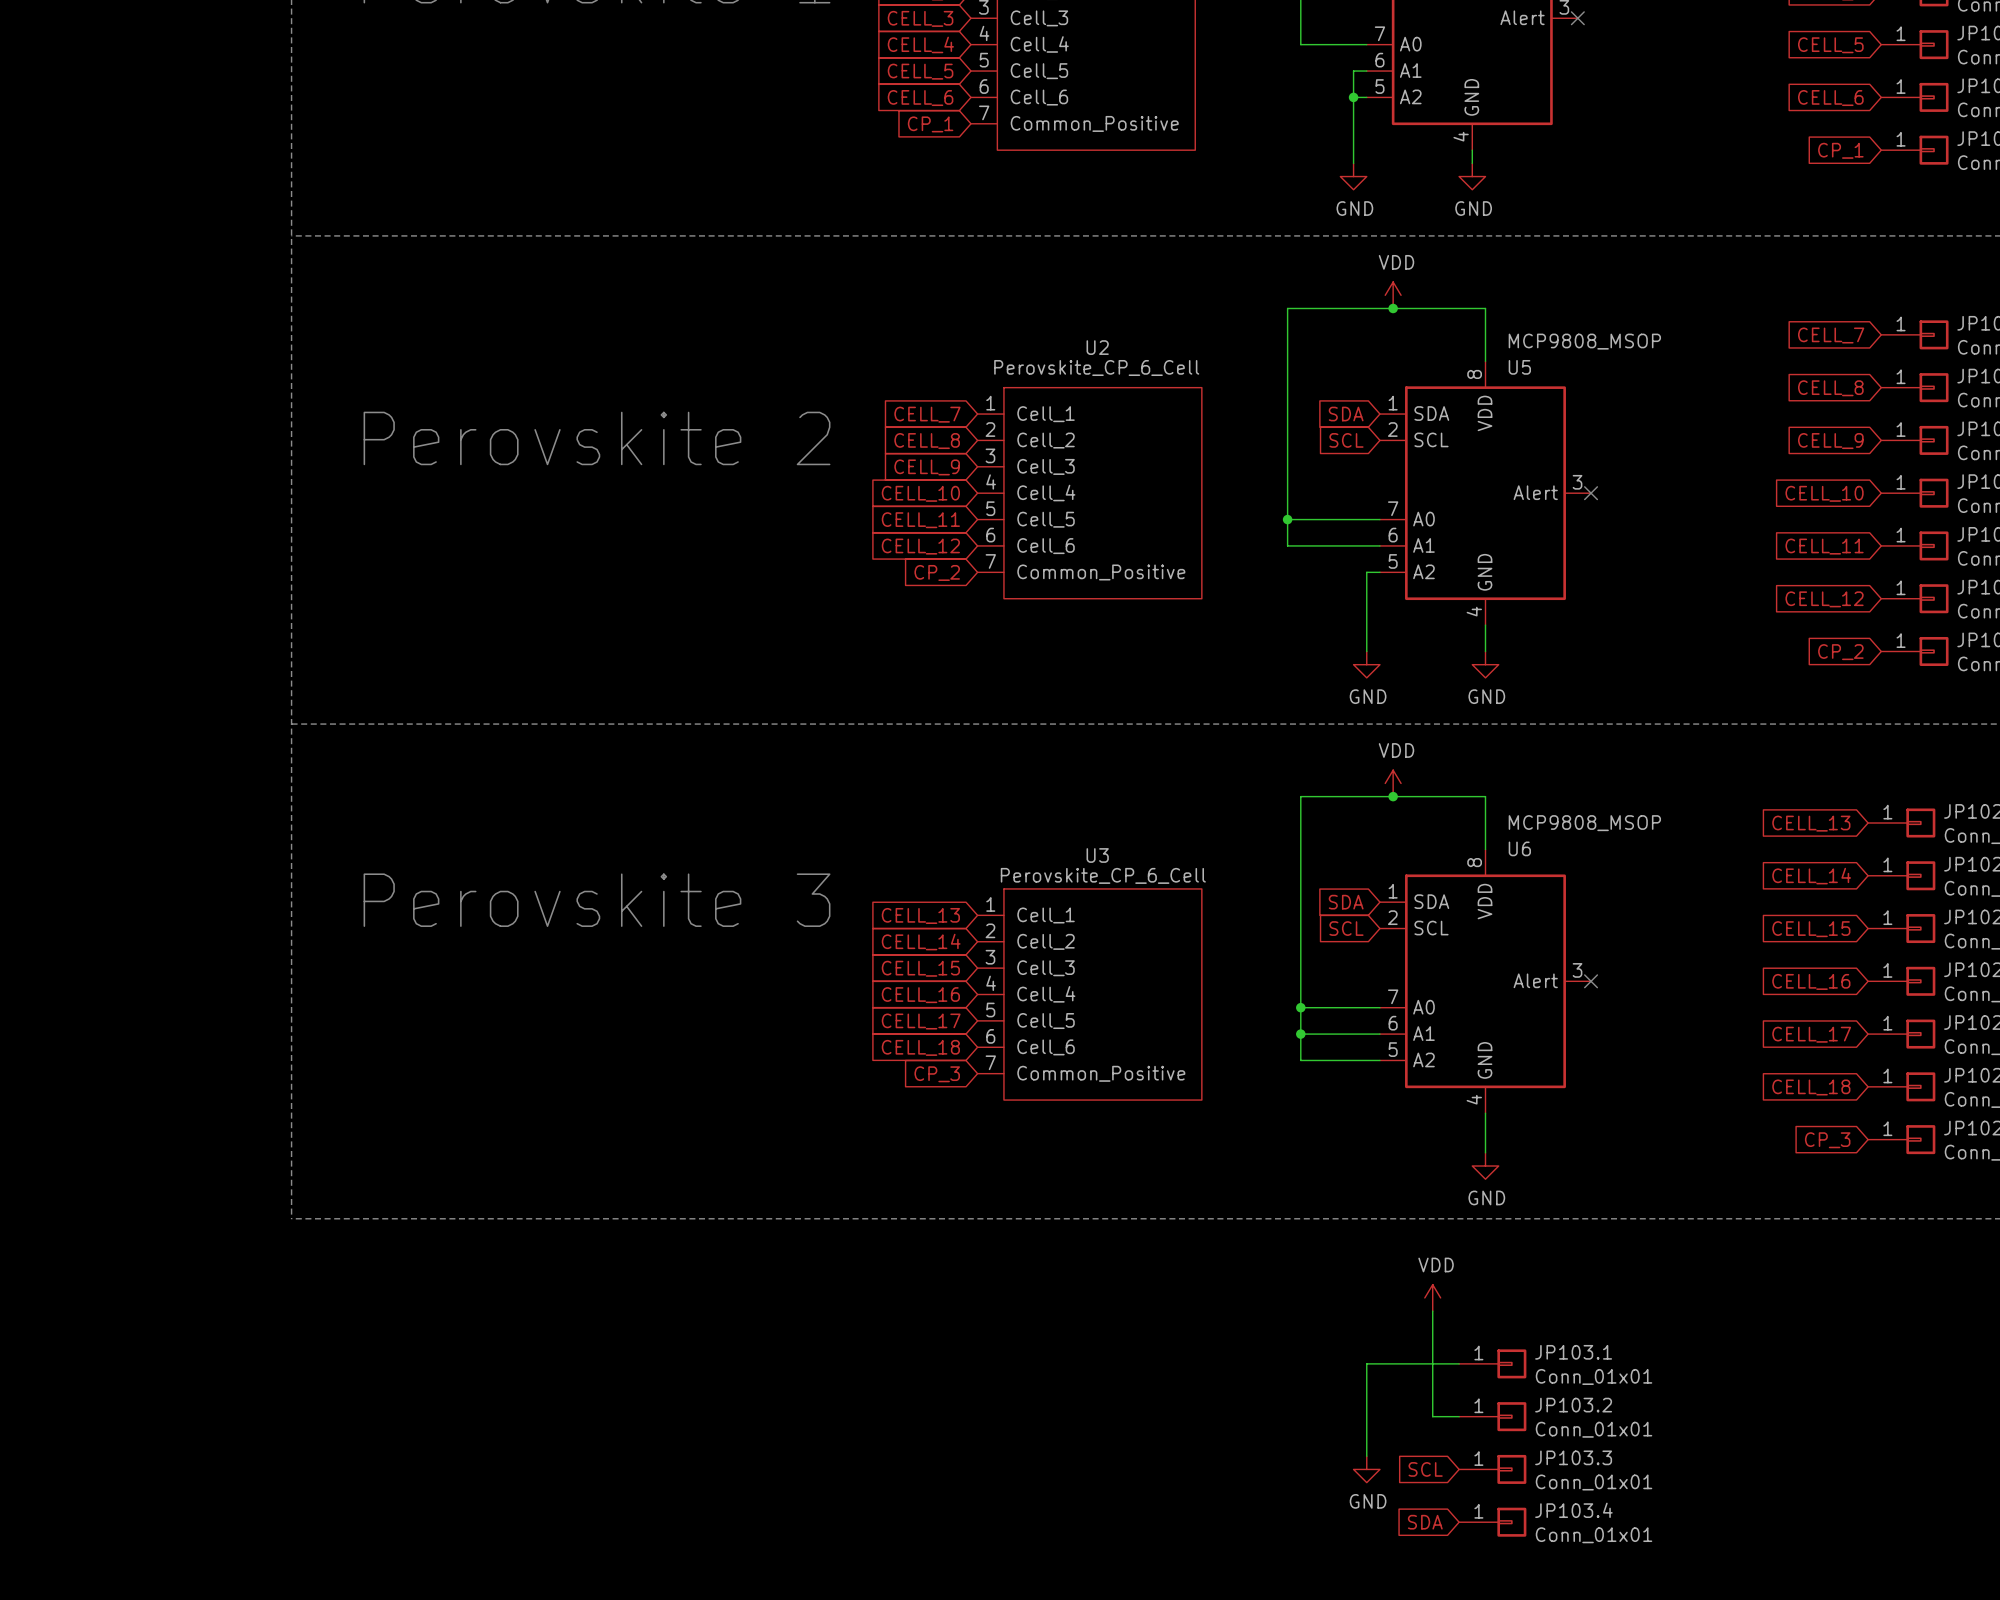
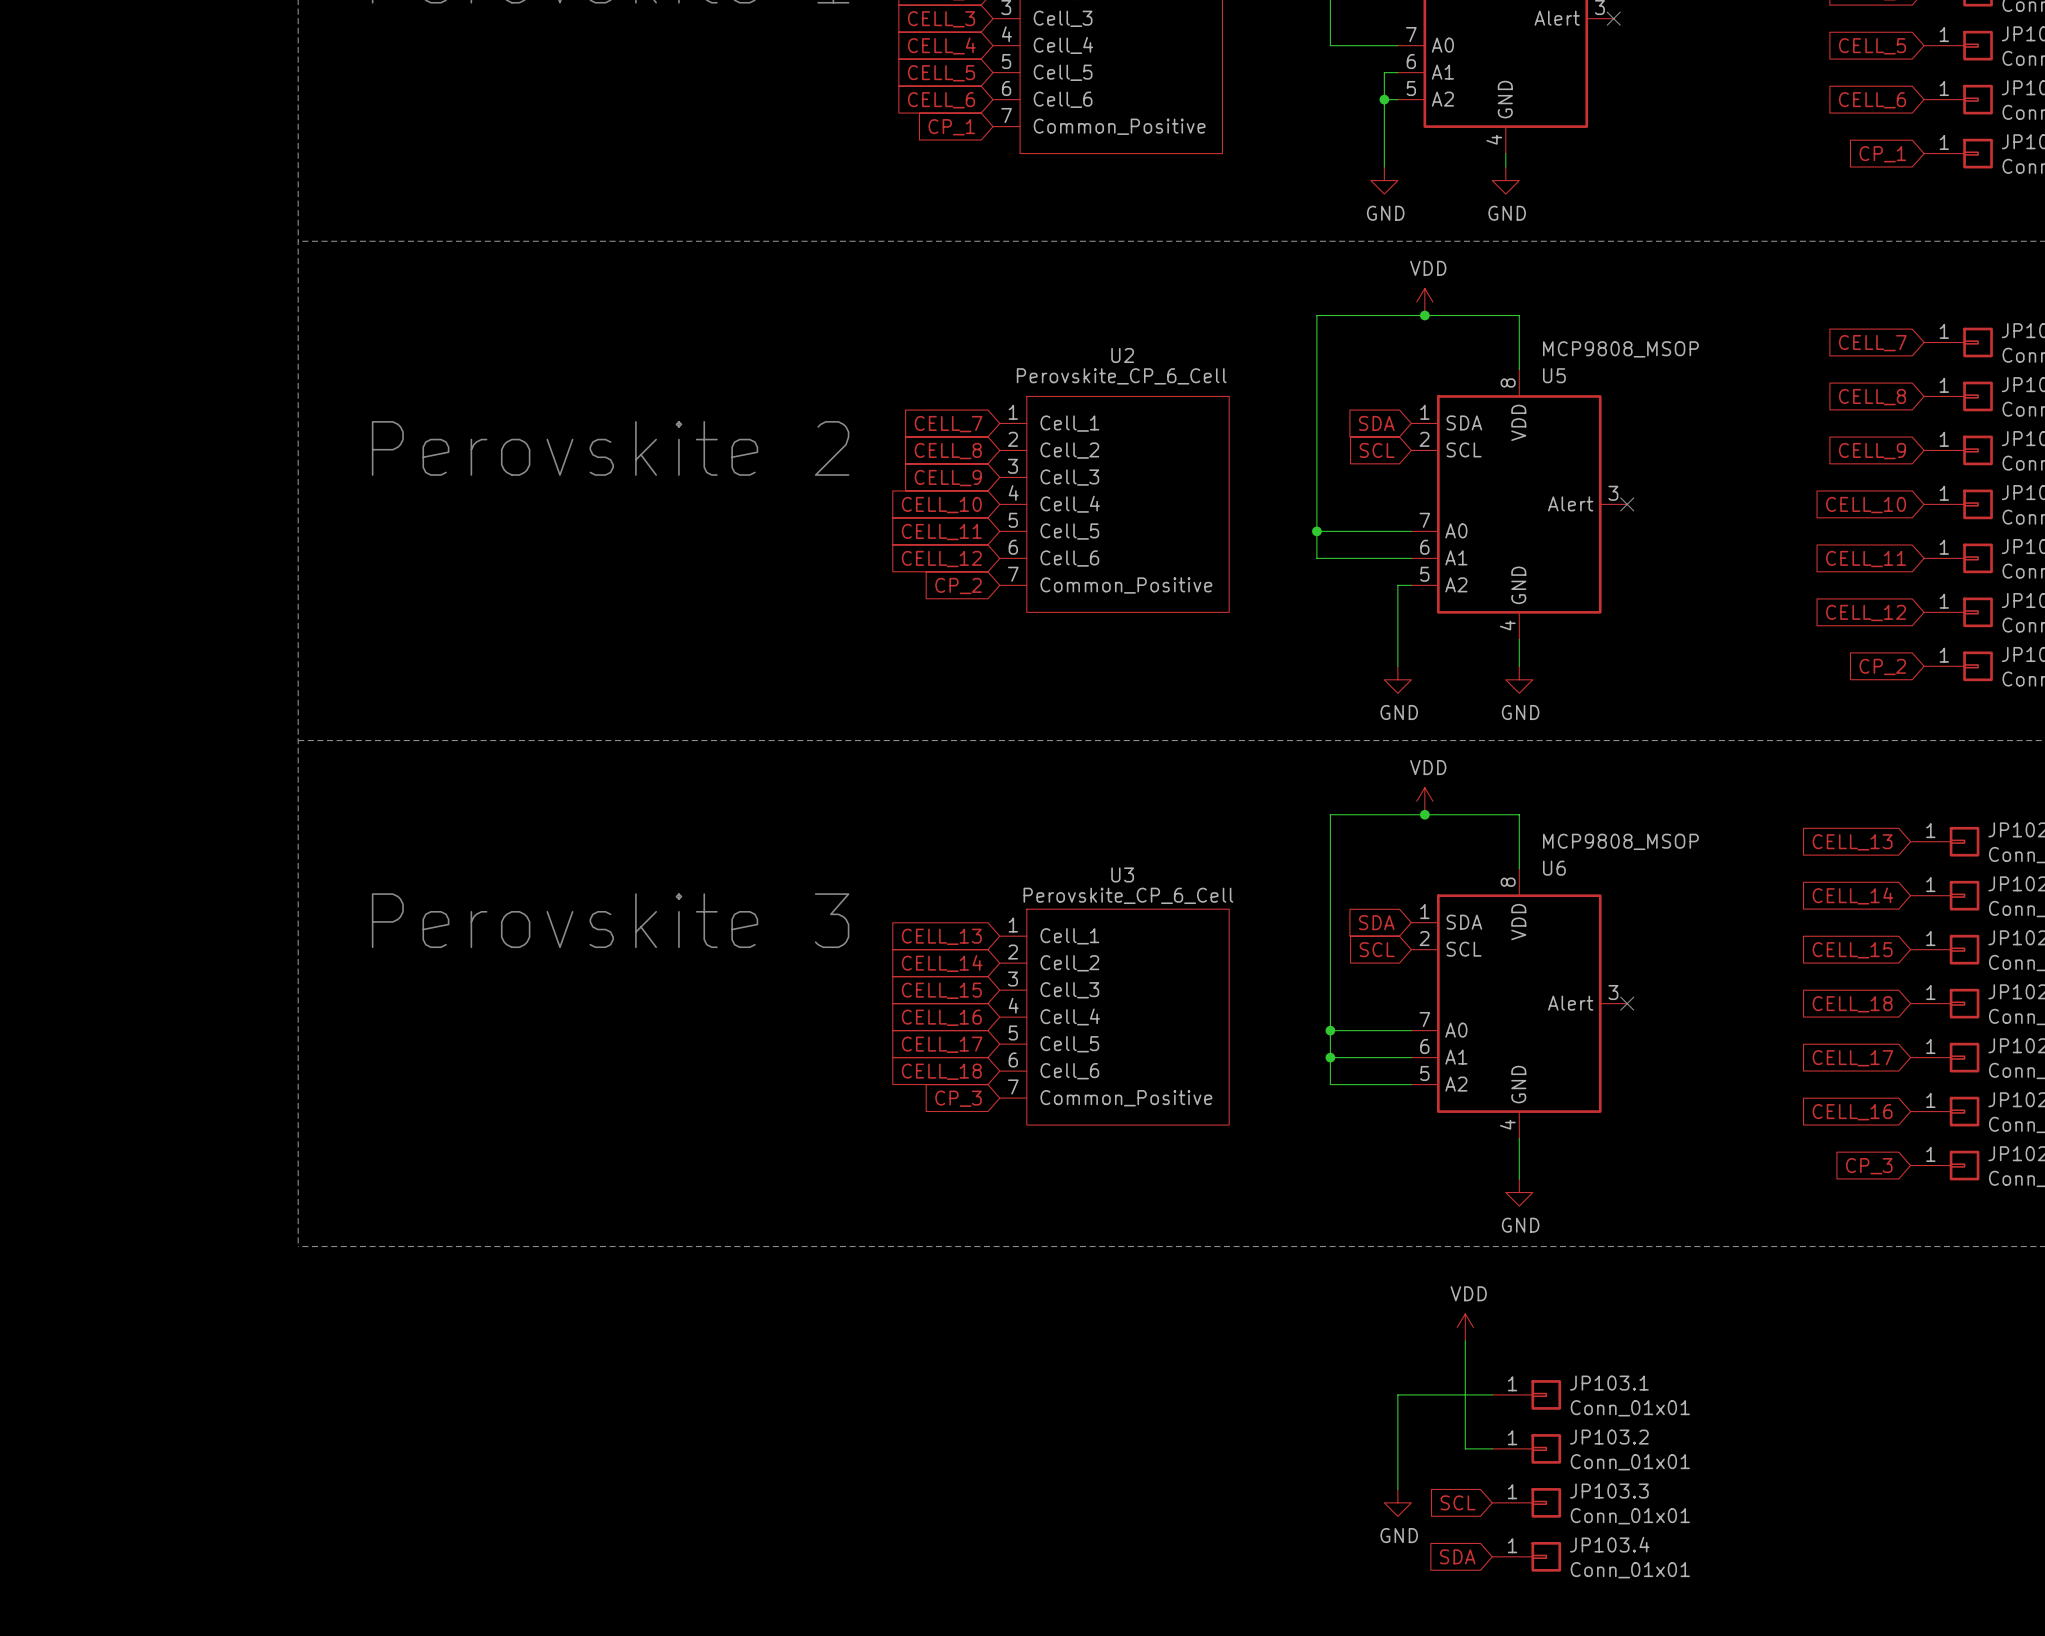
global label: CELL_16 (1811, 981) -> CELL_18 (1852, 1004)
global label: CELL_18 (1811, 1087) -> CELL_16 (1852, 1112)

